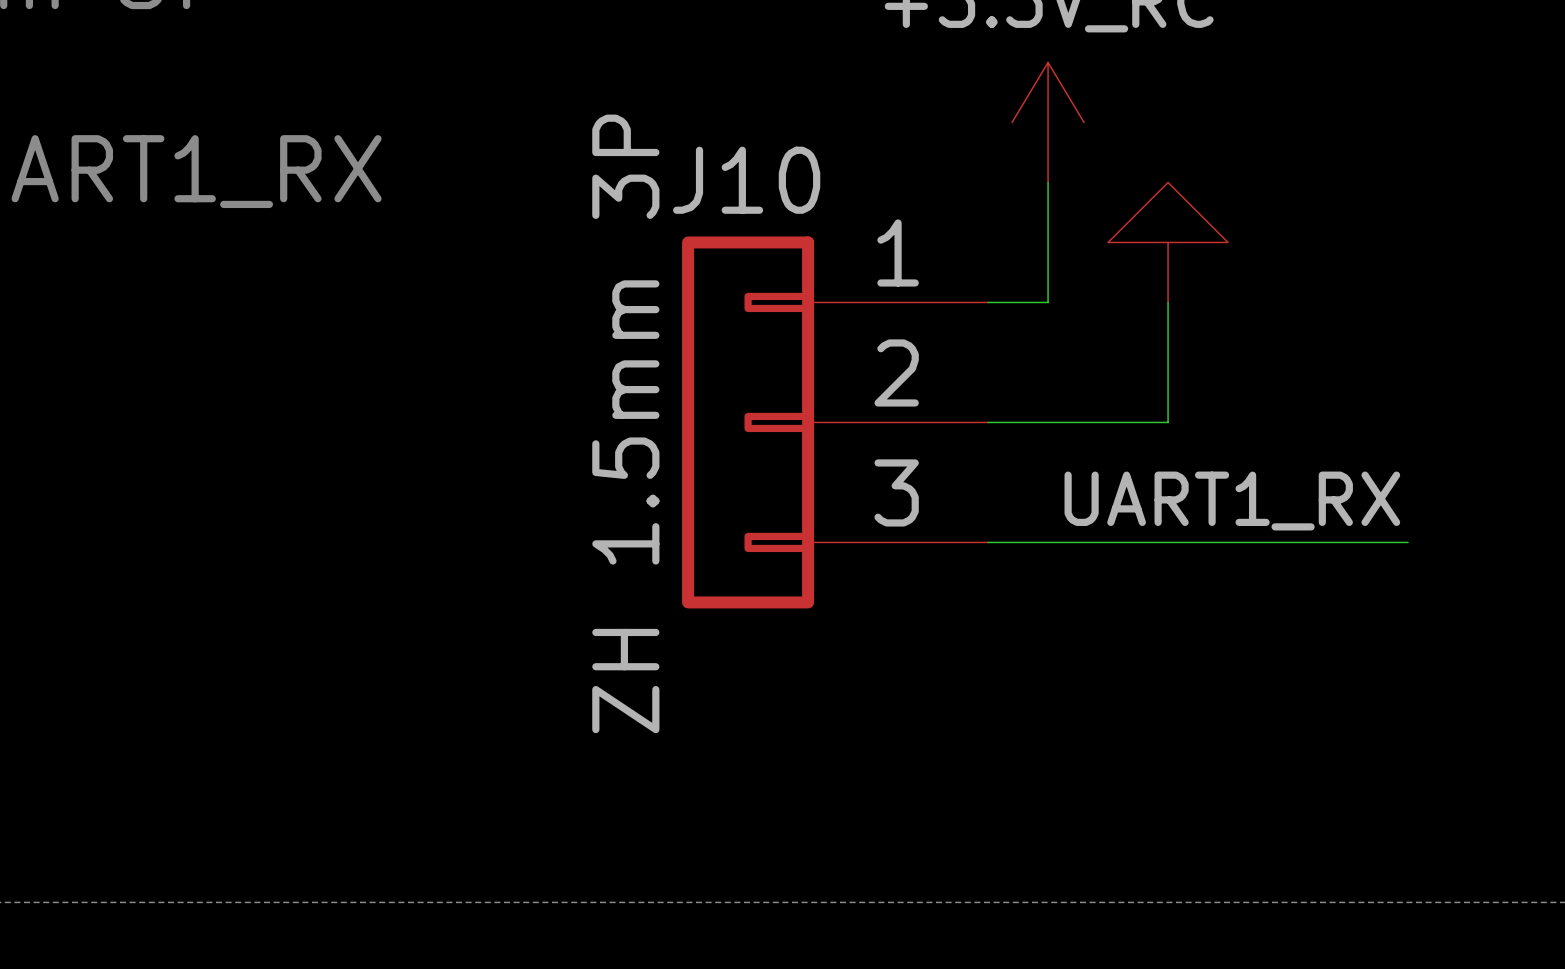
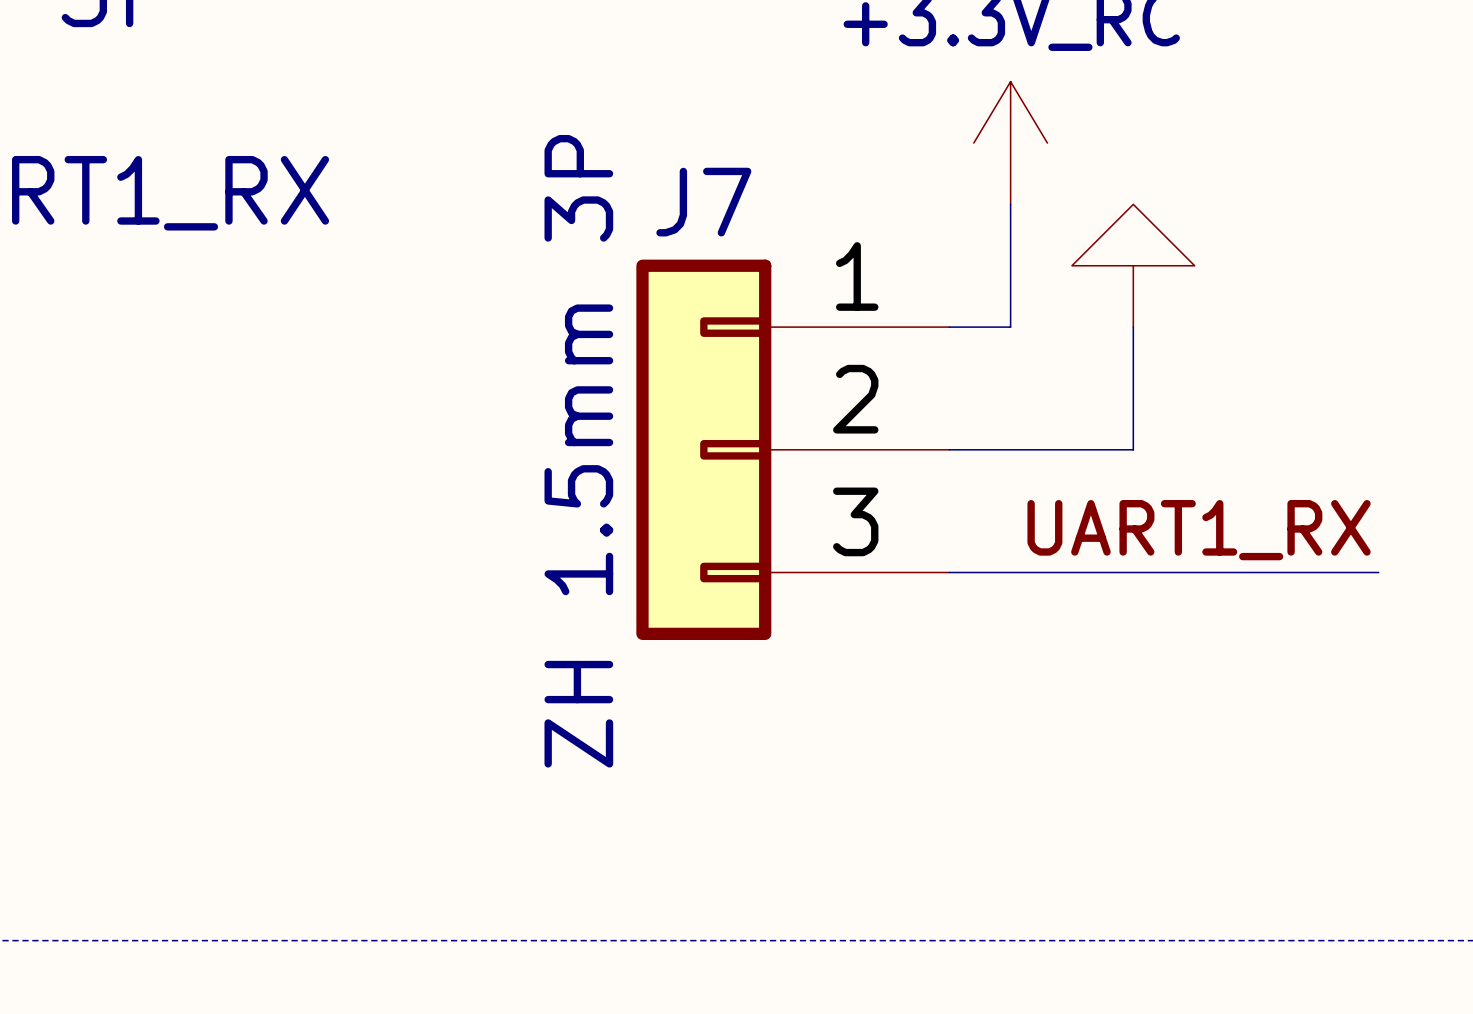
J10 name: J10 (746, 180) -> J7 (703, 202)

